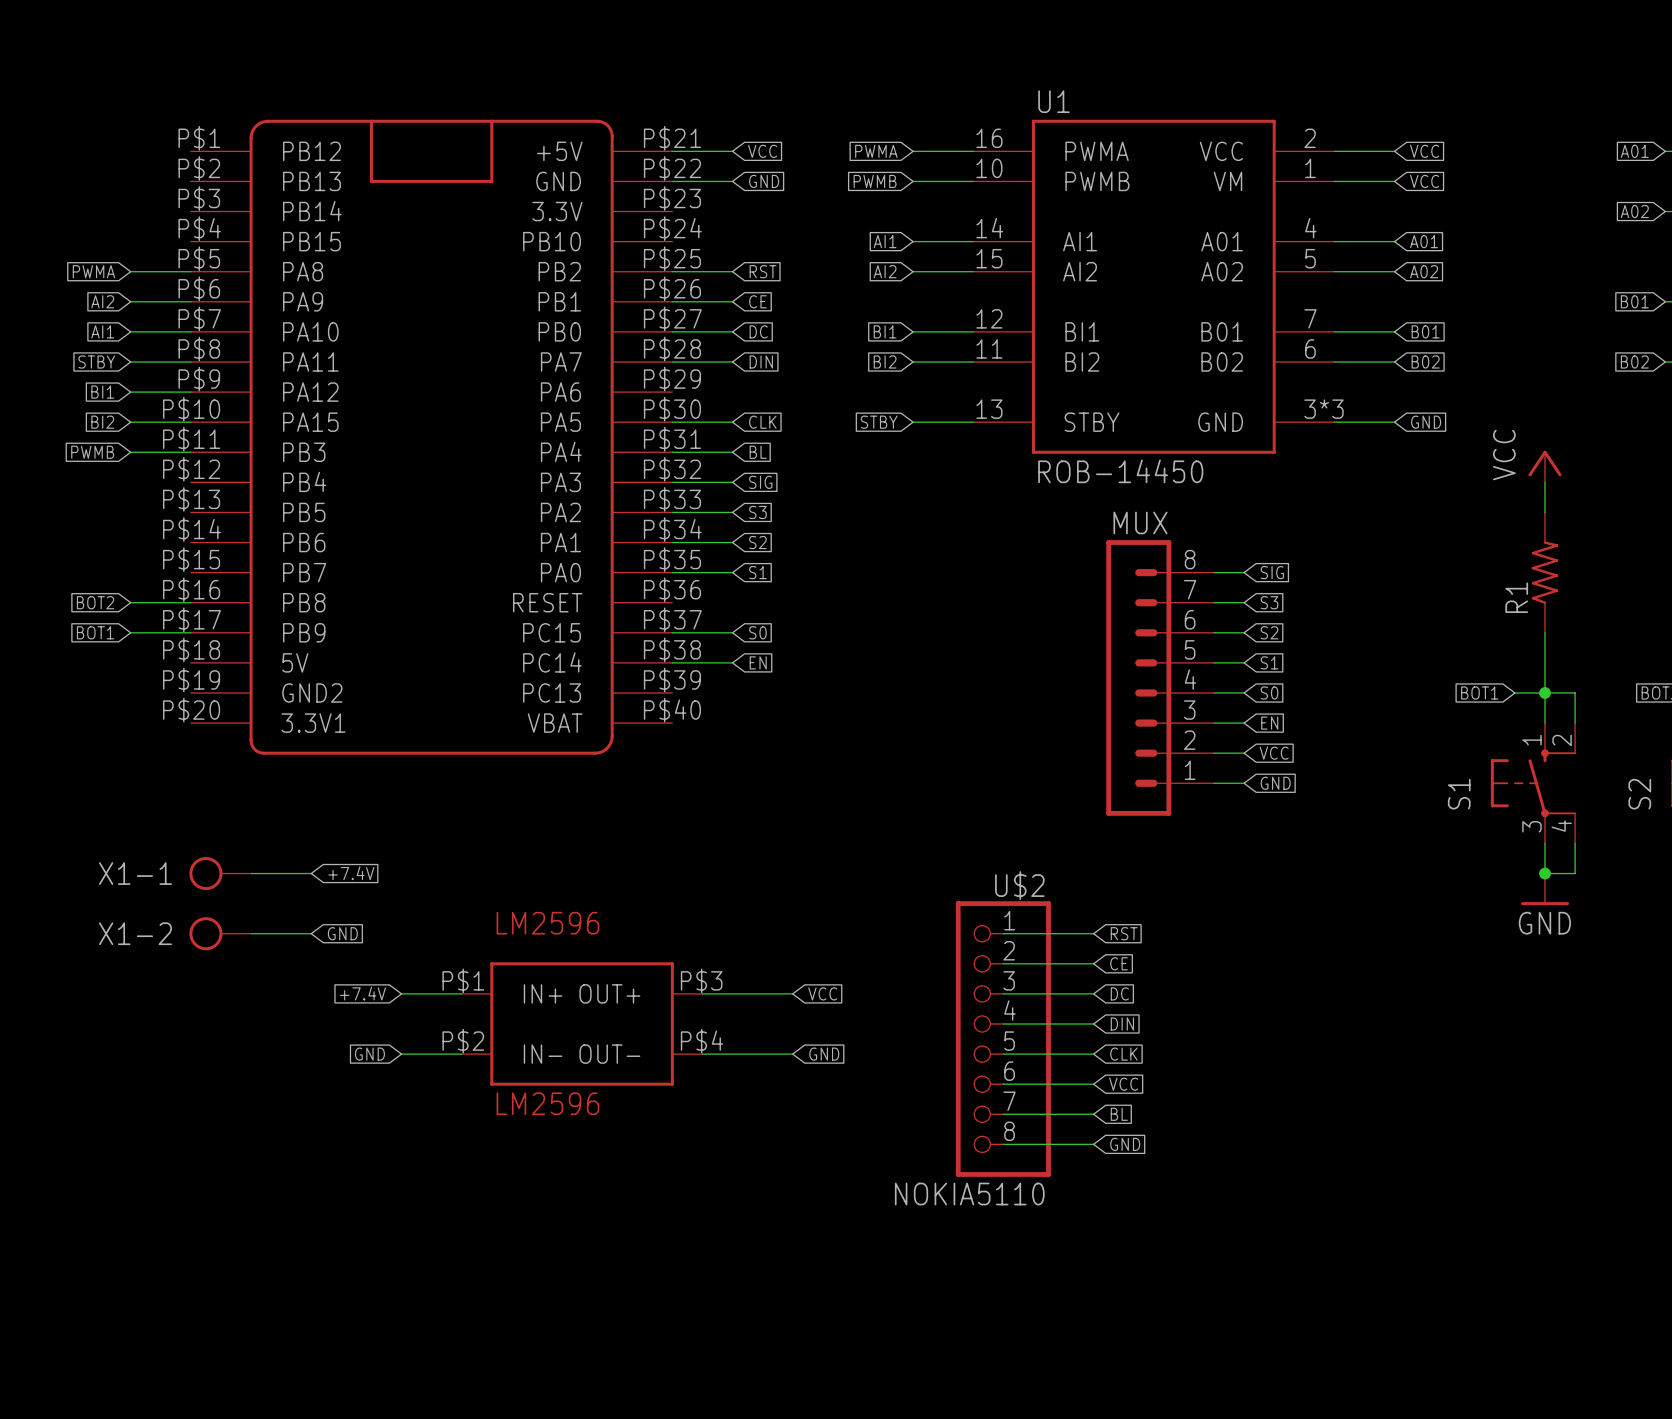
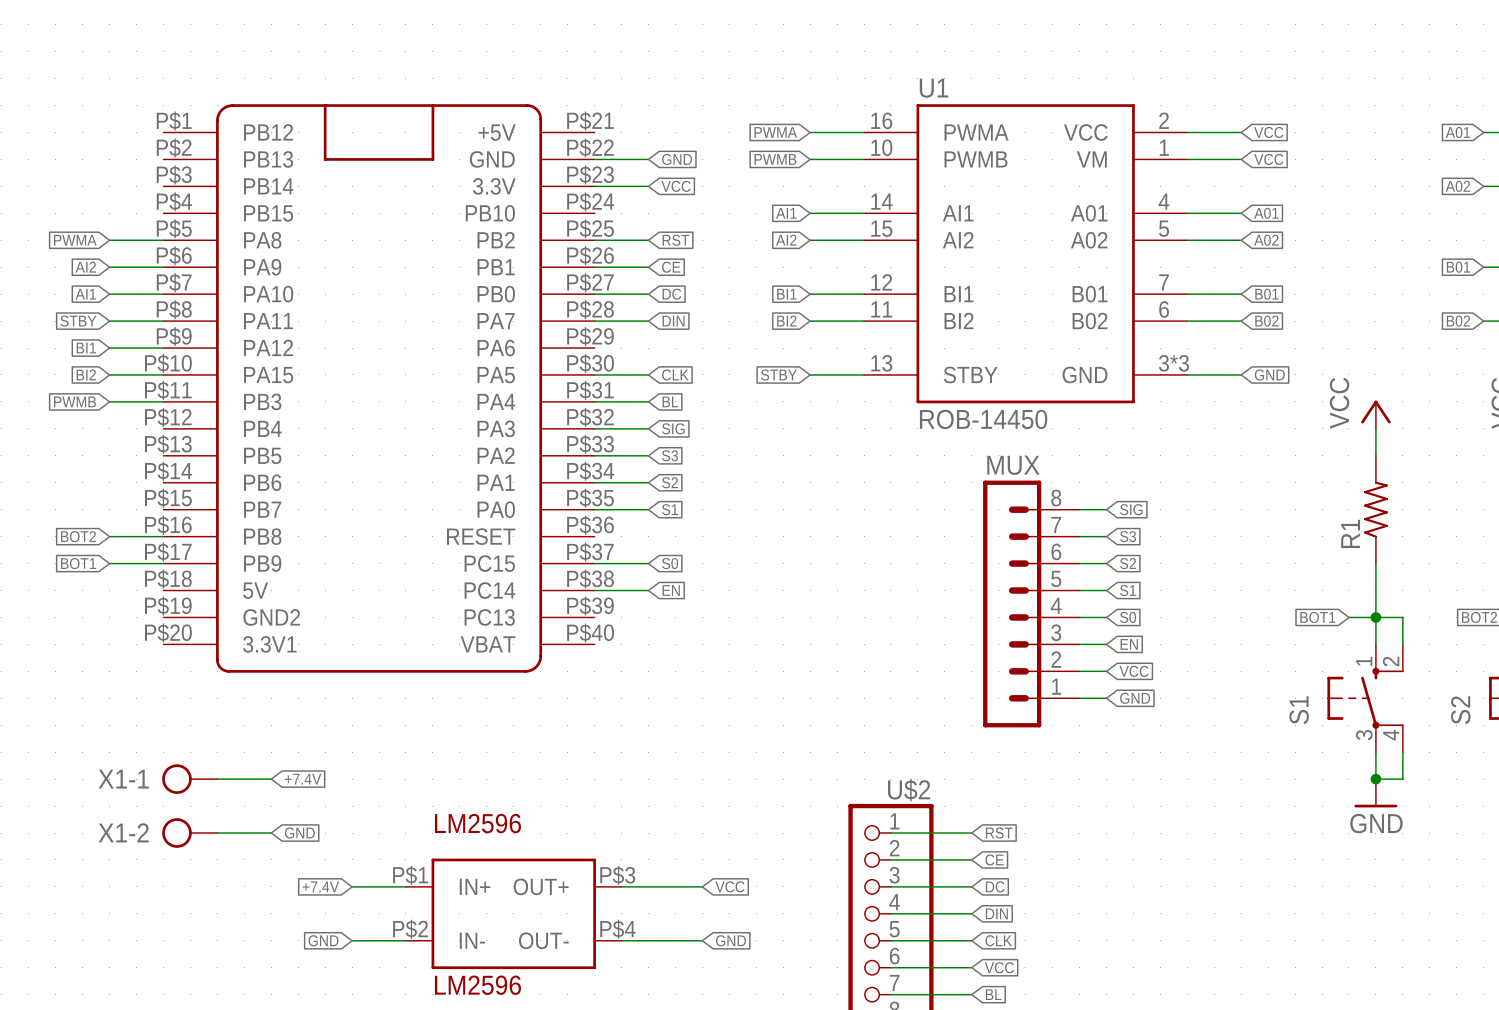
wire: (672, 151) (732, 151) -> (594, 186) (648, 186)
global label position: VCC (762, 151) -> VCC (676, 186)

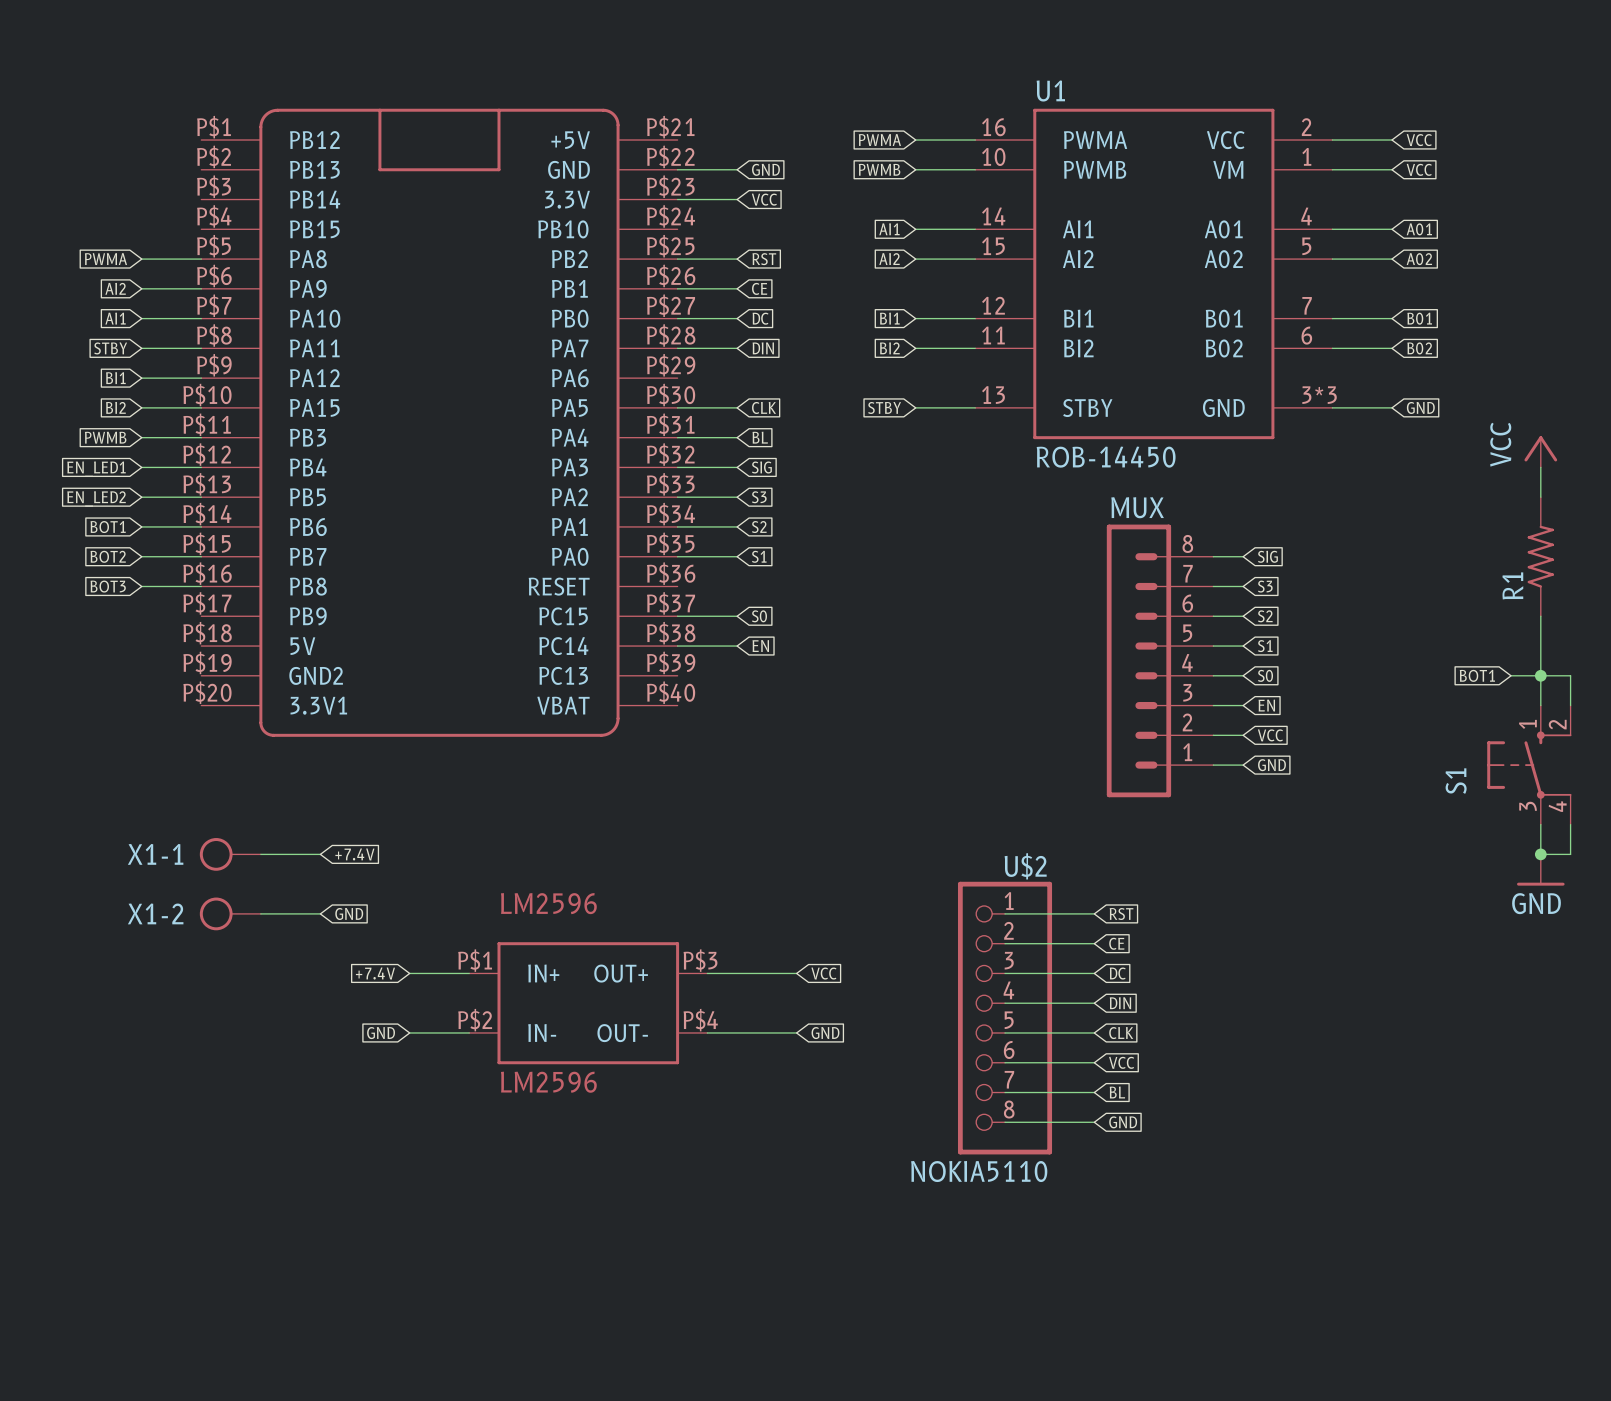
wire: none -> (141, 467) (201, 467)
global label: none -> EN_LED1 (96, 469)
wire: none -> (141, 497) (201, 497)
global label: none -> EN_LED2 (96, 498)
wire: none -> (141, 526) (201, 526)
global label: none -> BOT2 (108, 556)
global label: BOT2 (78, 536) -> BOT3 (108, 586)
global label position: BOT1 (78, 563) -> BOT1 (108, 527)
wire: (109, 563) (163, 563) -> (141, 556) (201, 556)

